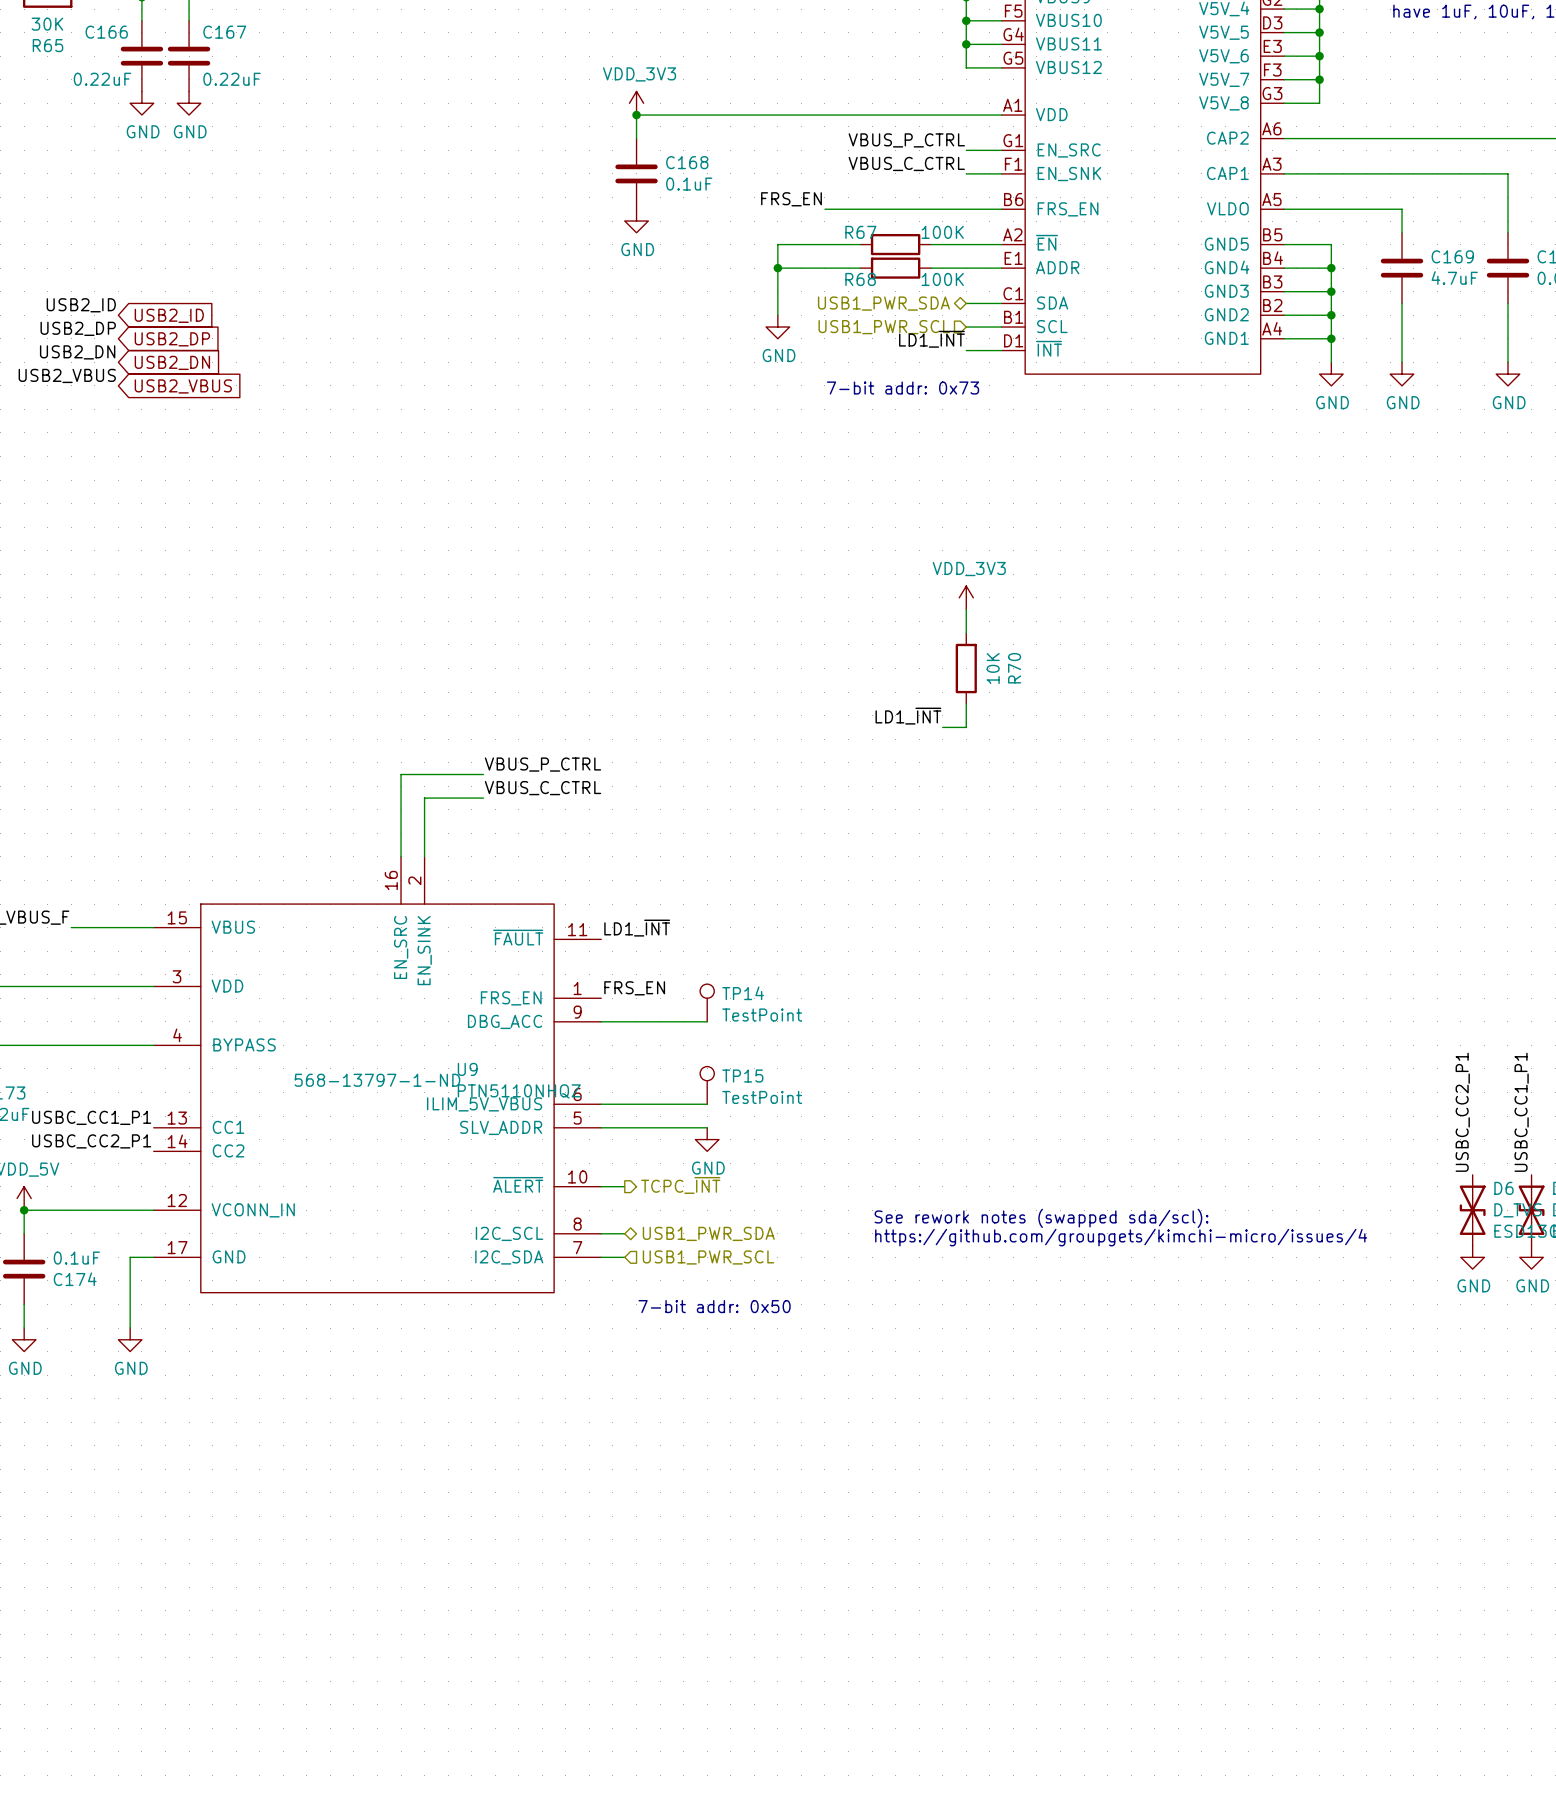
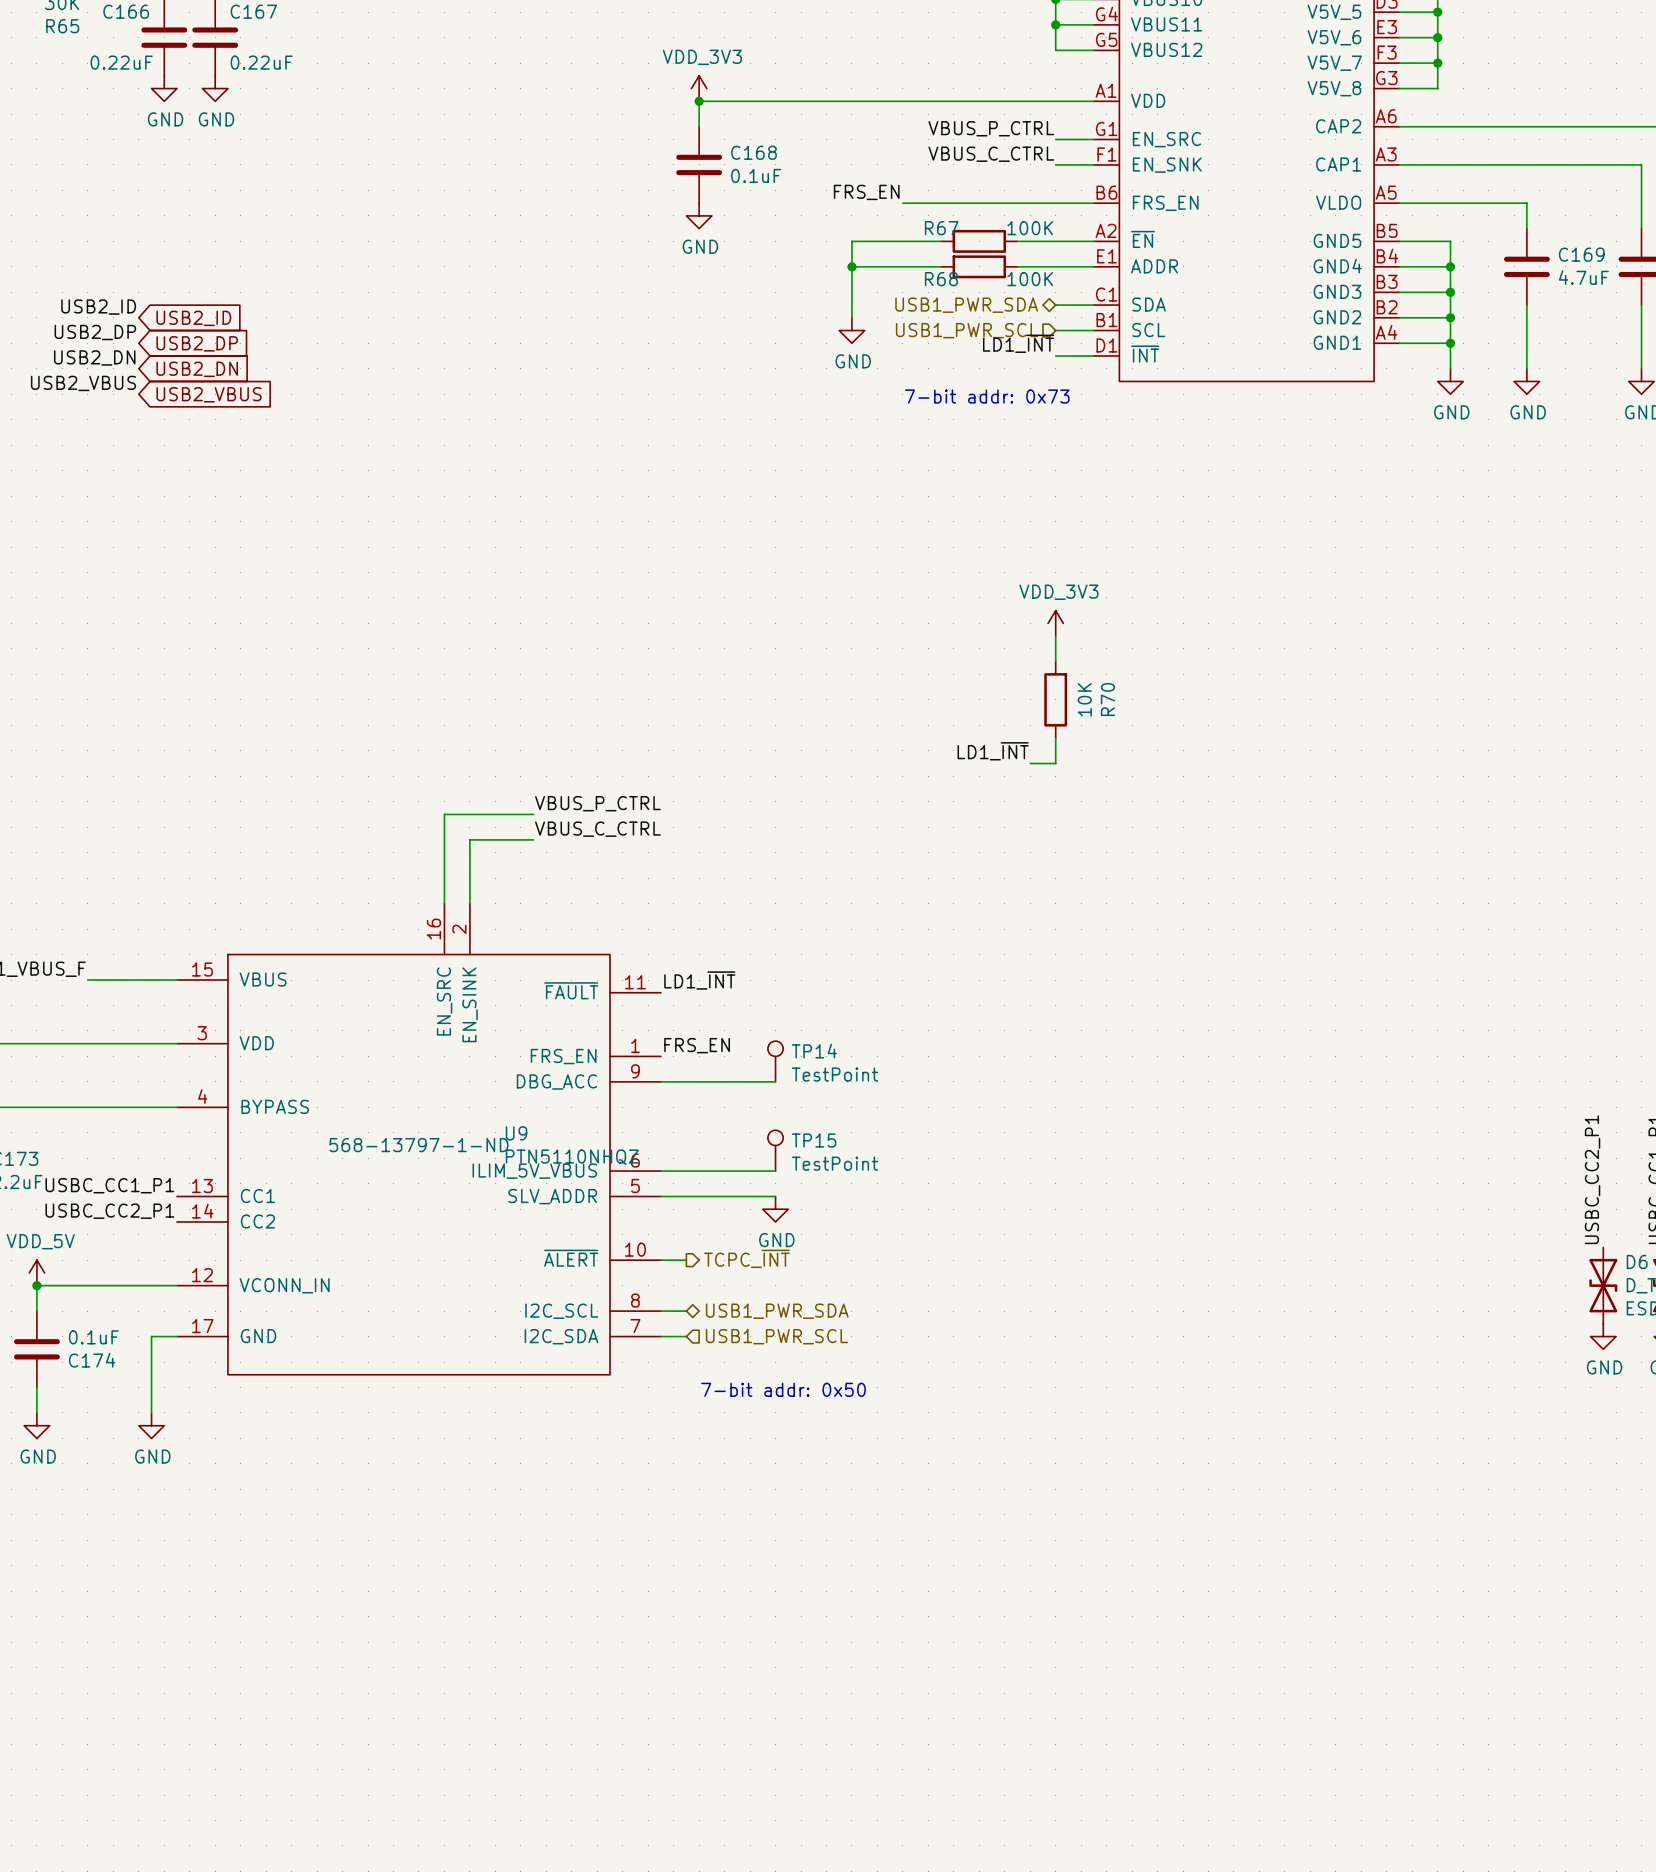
text: See rework notes (swapped sda/scl): (1041, 1218) -> none
text: https://github.com/groupgets/kimchi-micro/issues/4 (1121, 1237) -> none

